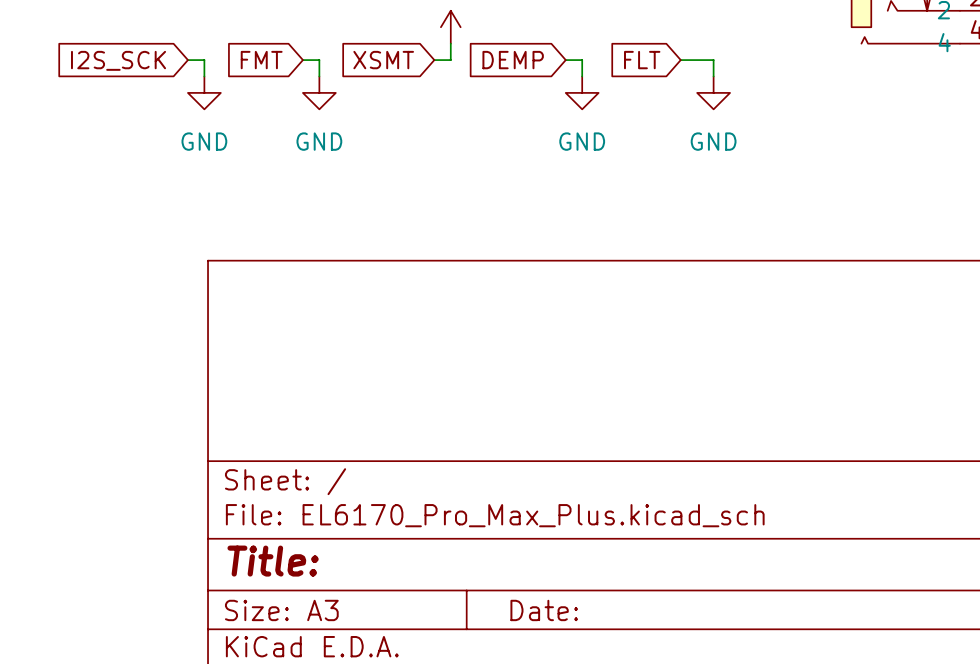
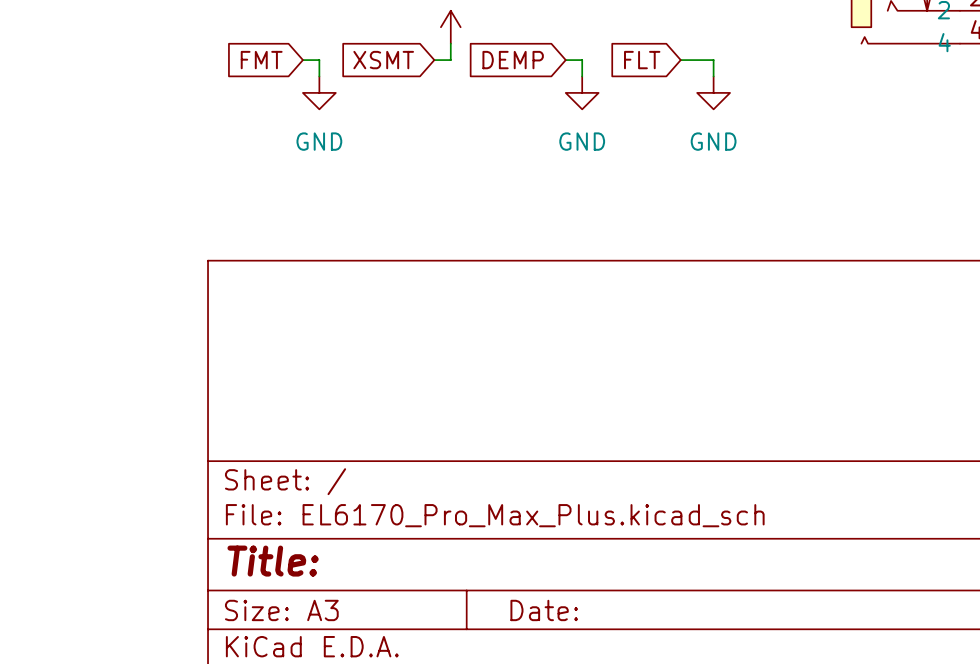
global label: I2S_SCK (118, 60) -> none
wire: (187, 60) (204, 60) (204, 76) -> none
power symbol: GND (204, 92) -> none

